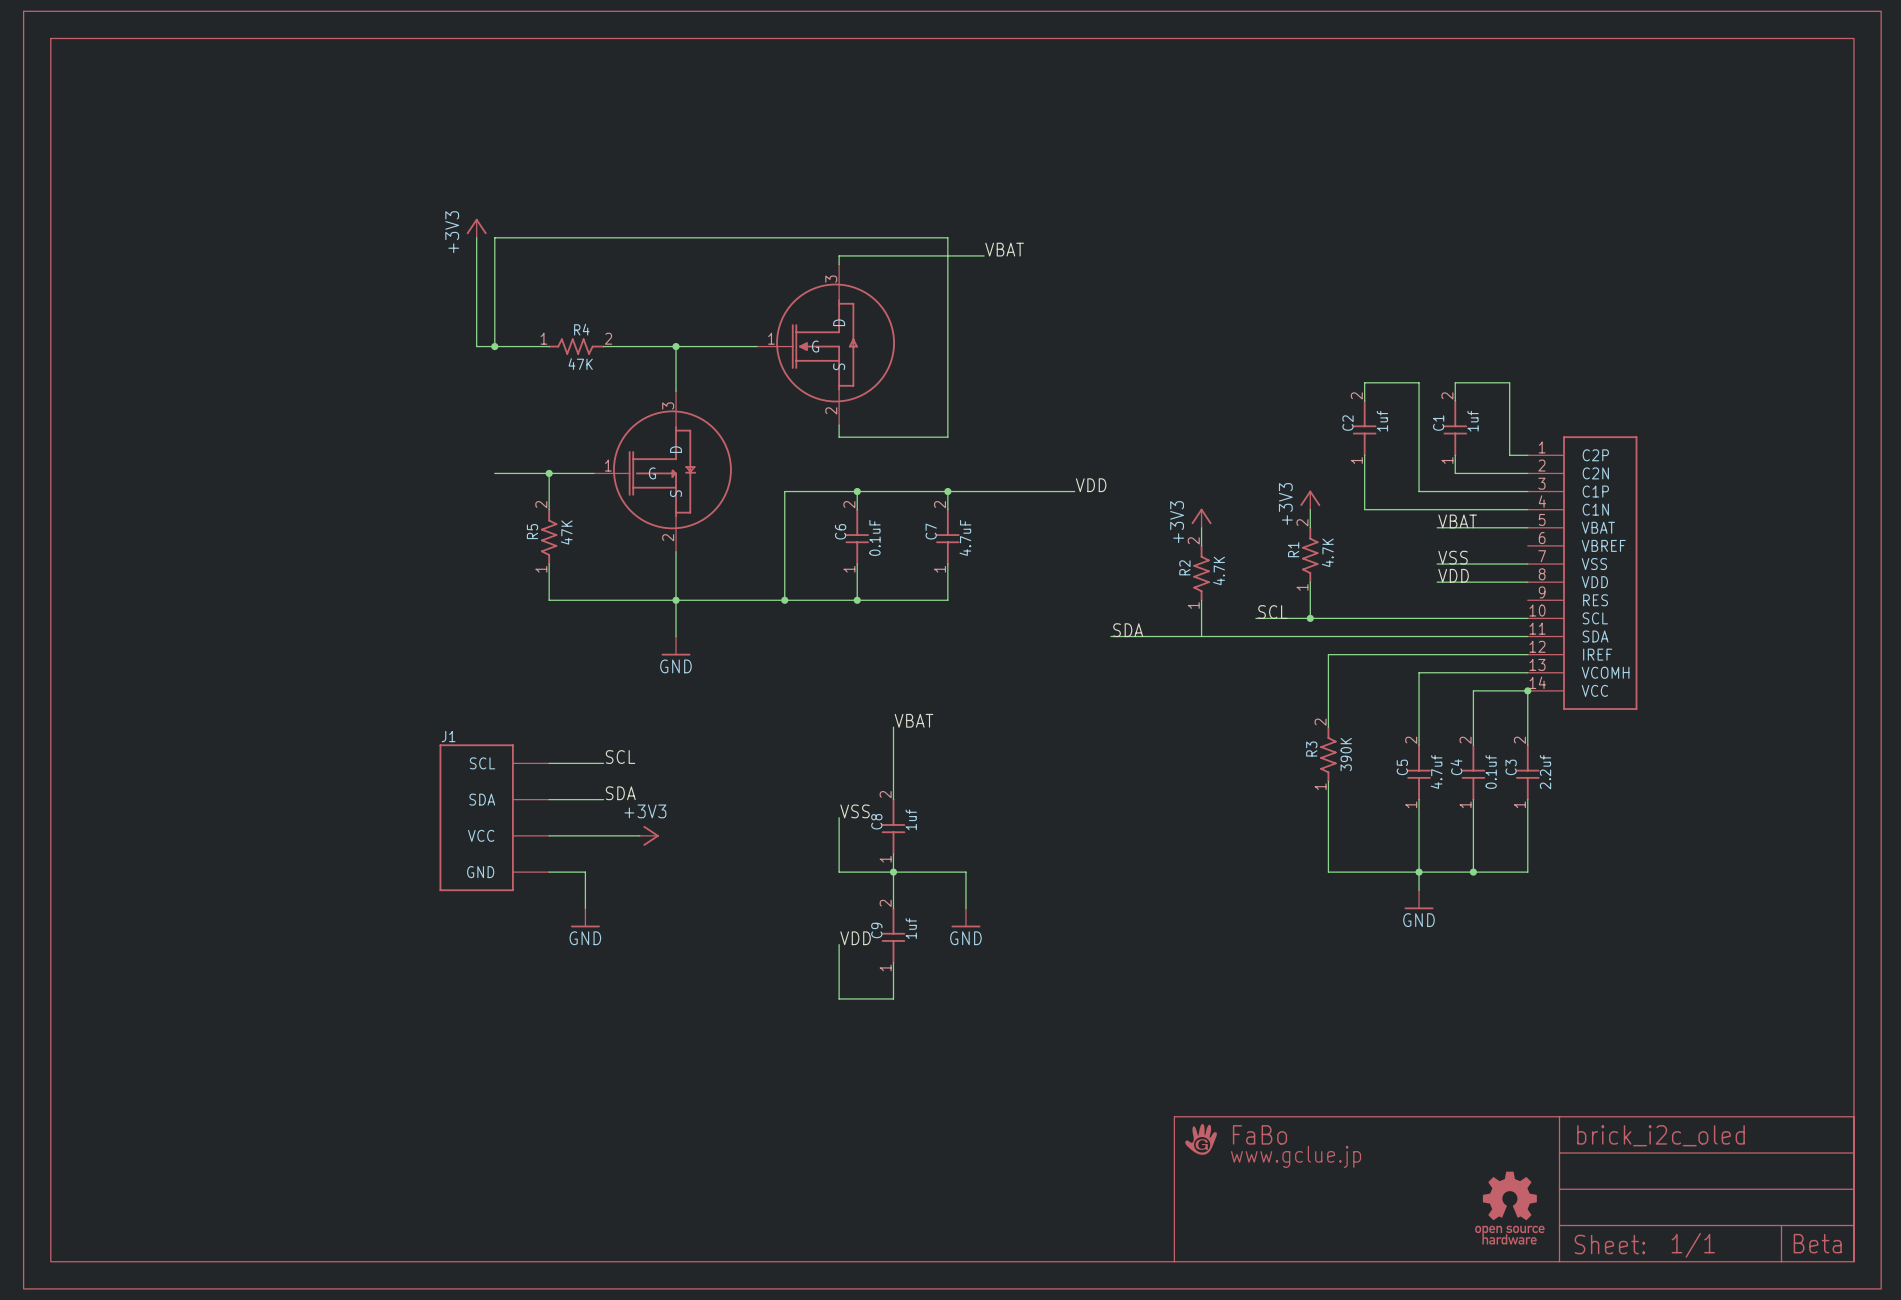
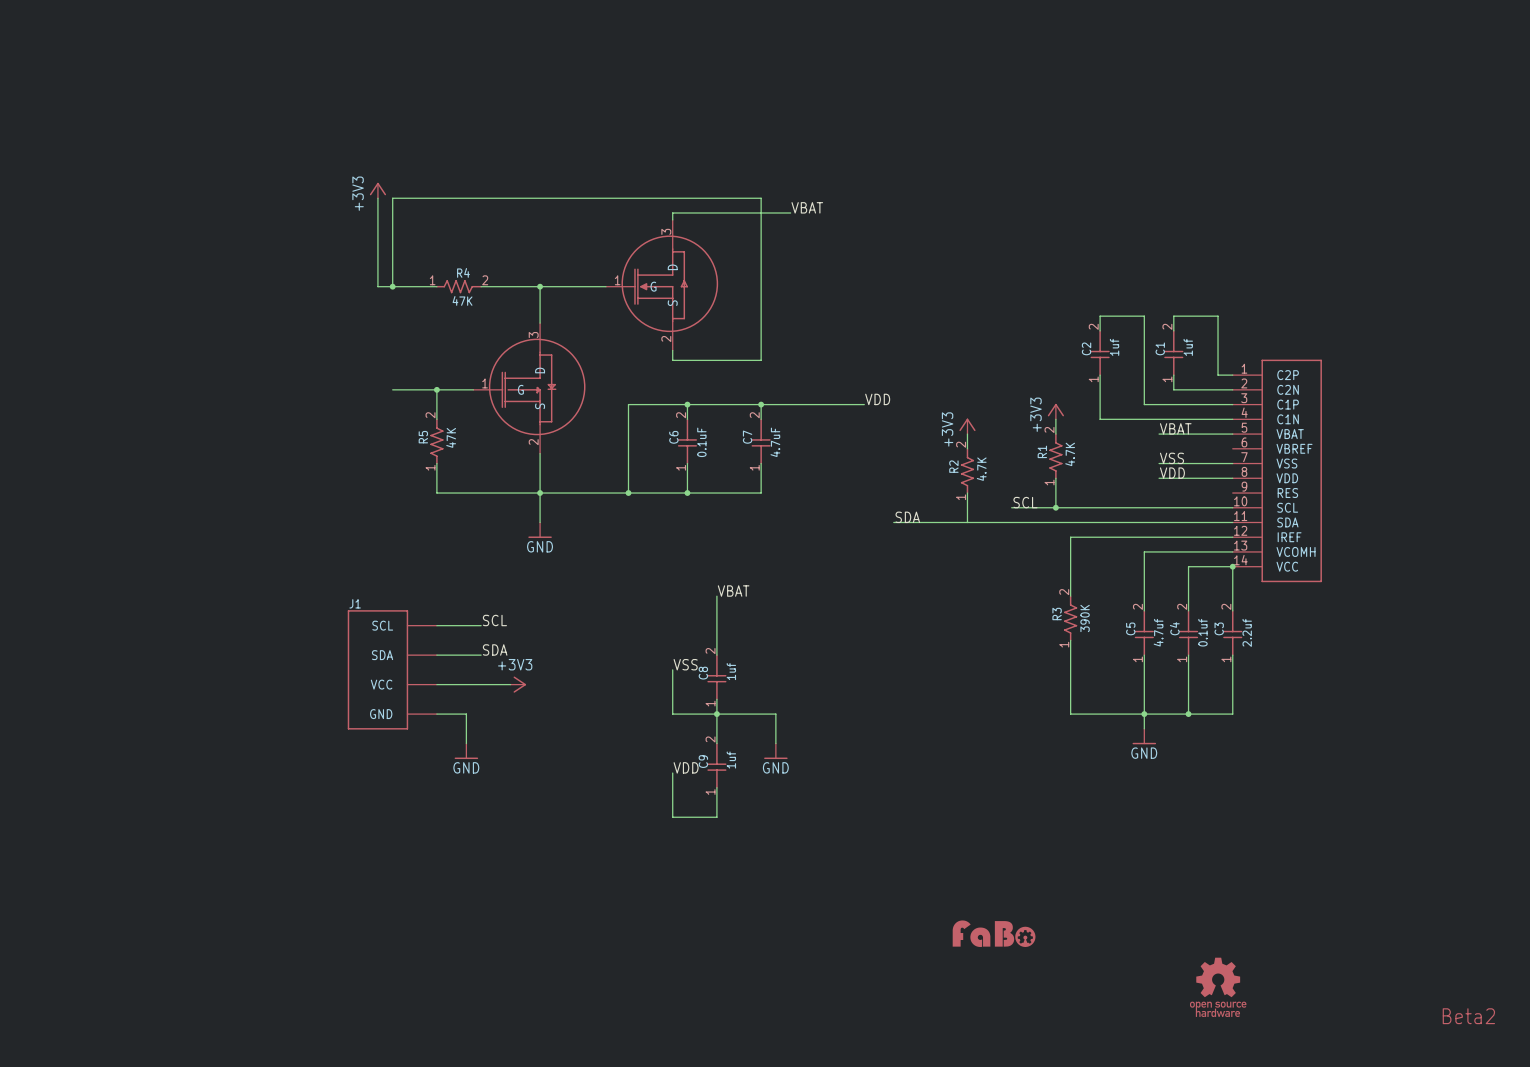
part: (952, 650) -> none
part: none -> (994, 933)
text: Beta (1817, 1243) -> Beta2 (1468, 1016)

